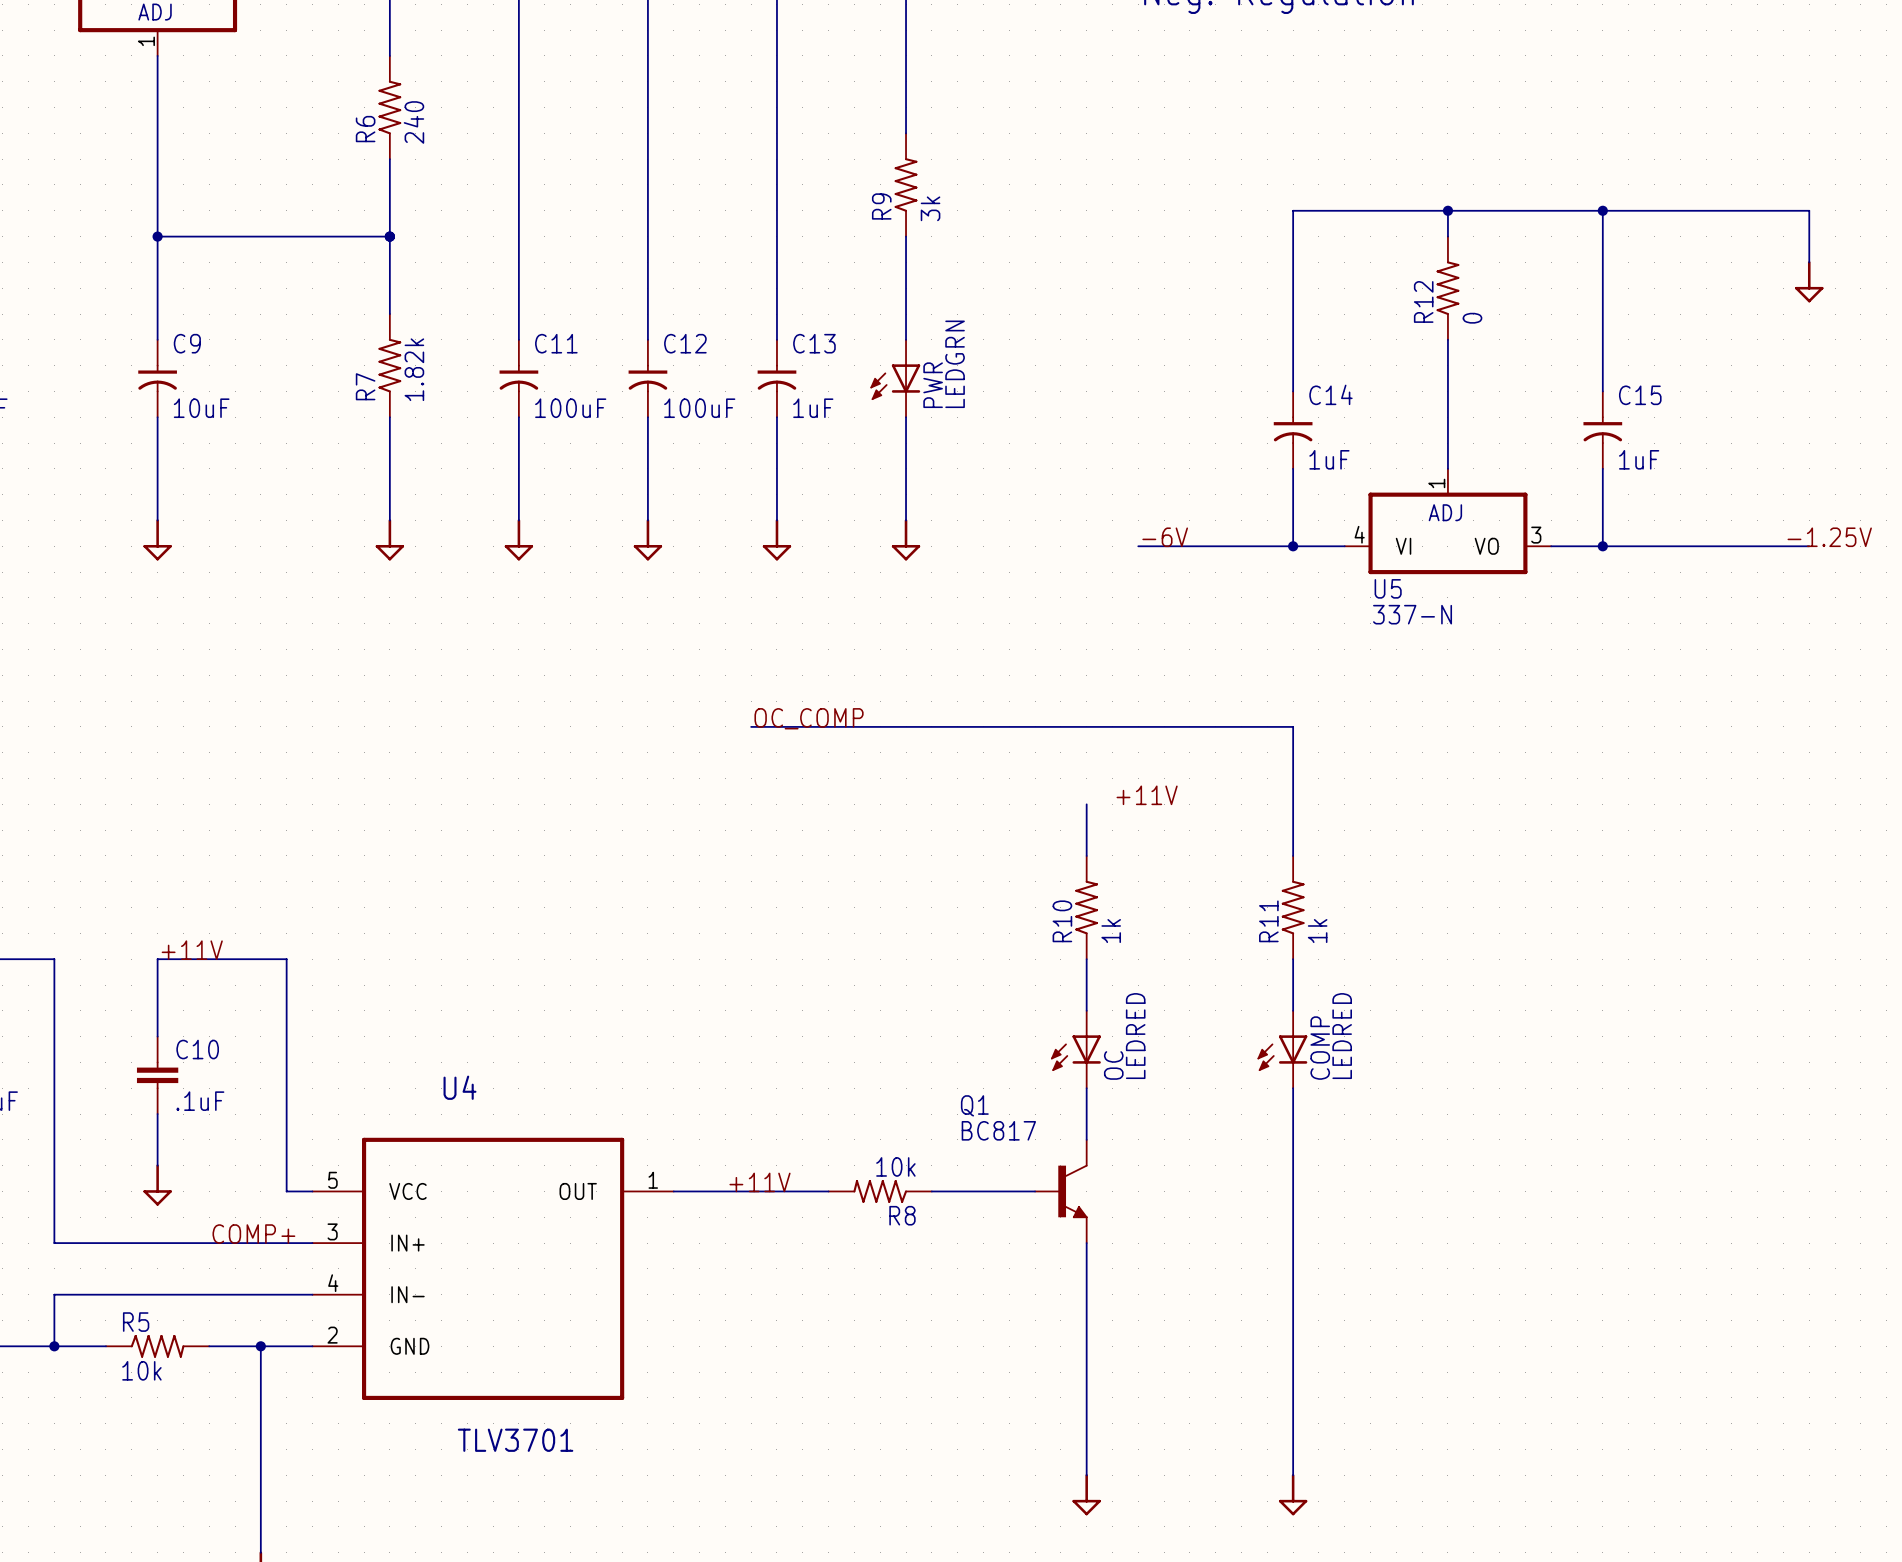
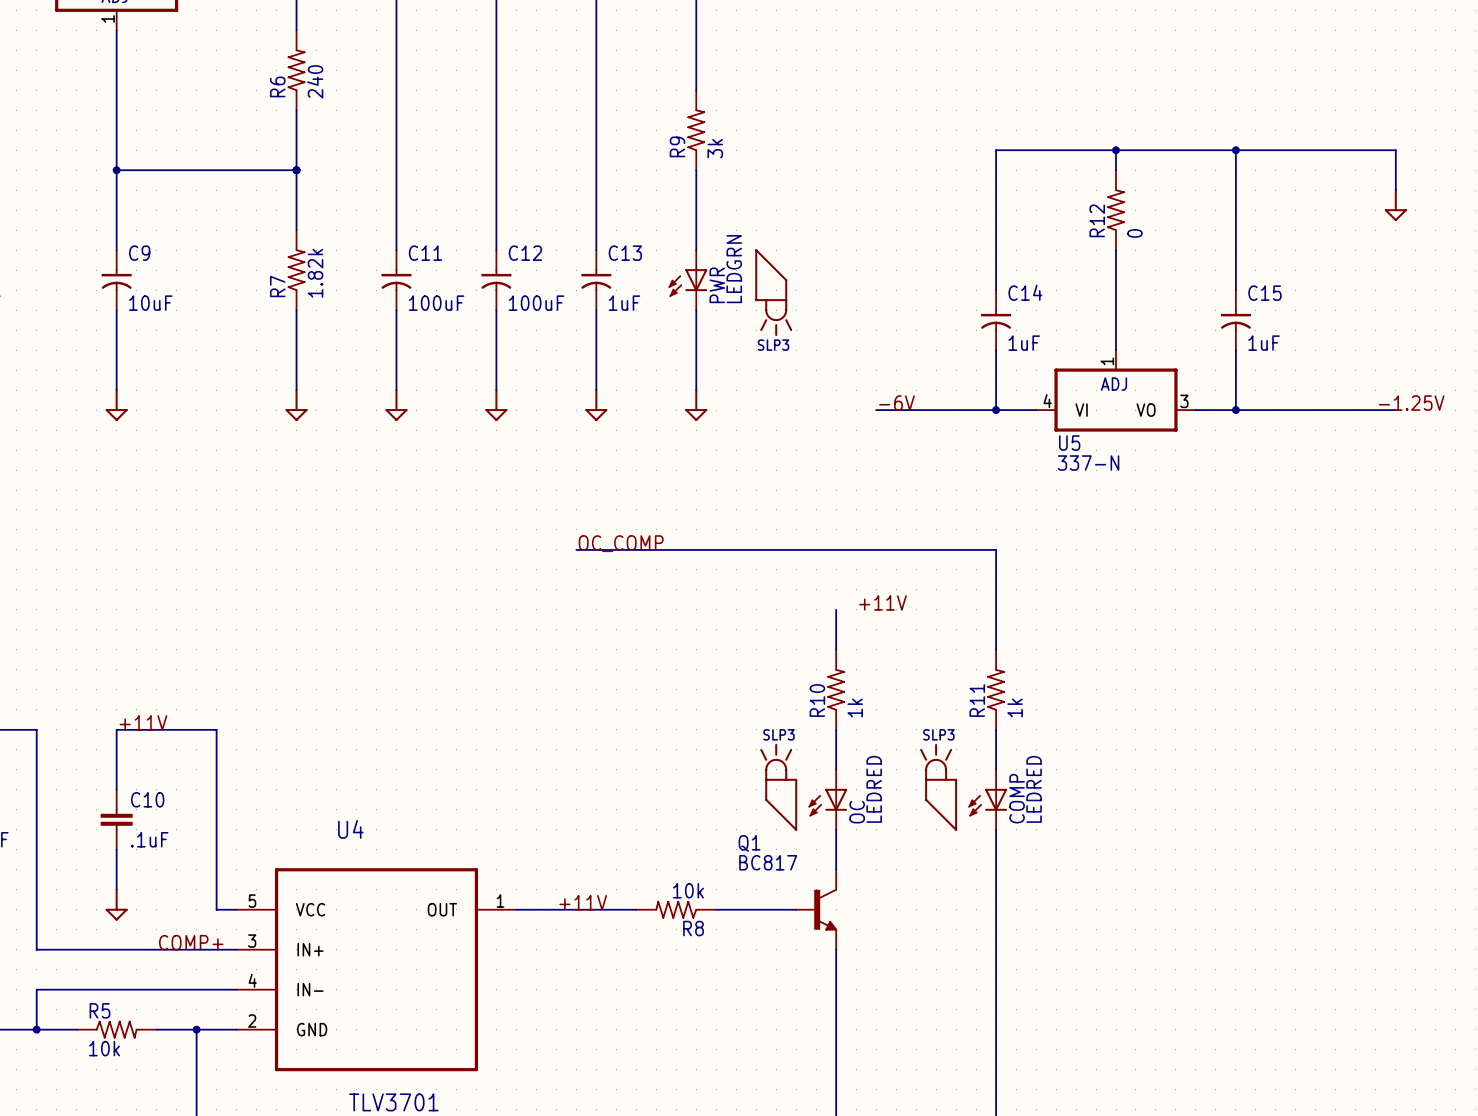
part: none -> SLP3 (773, 292)
part: none -> SLP3 (778, 787)
part: none -> SLP3 (938, 787)

